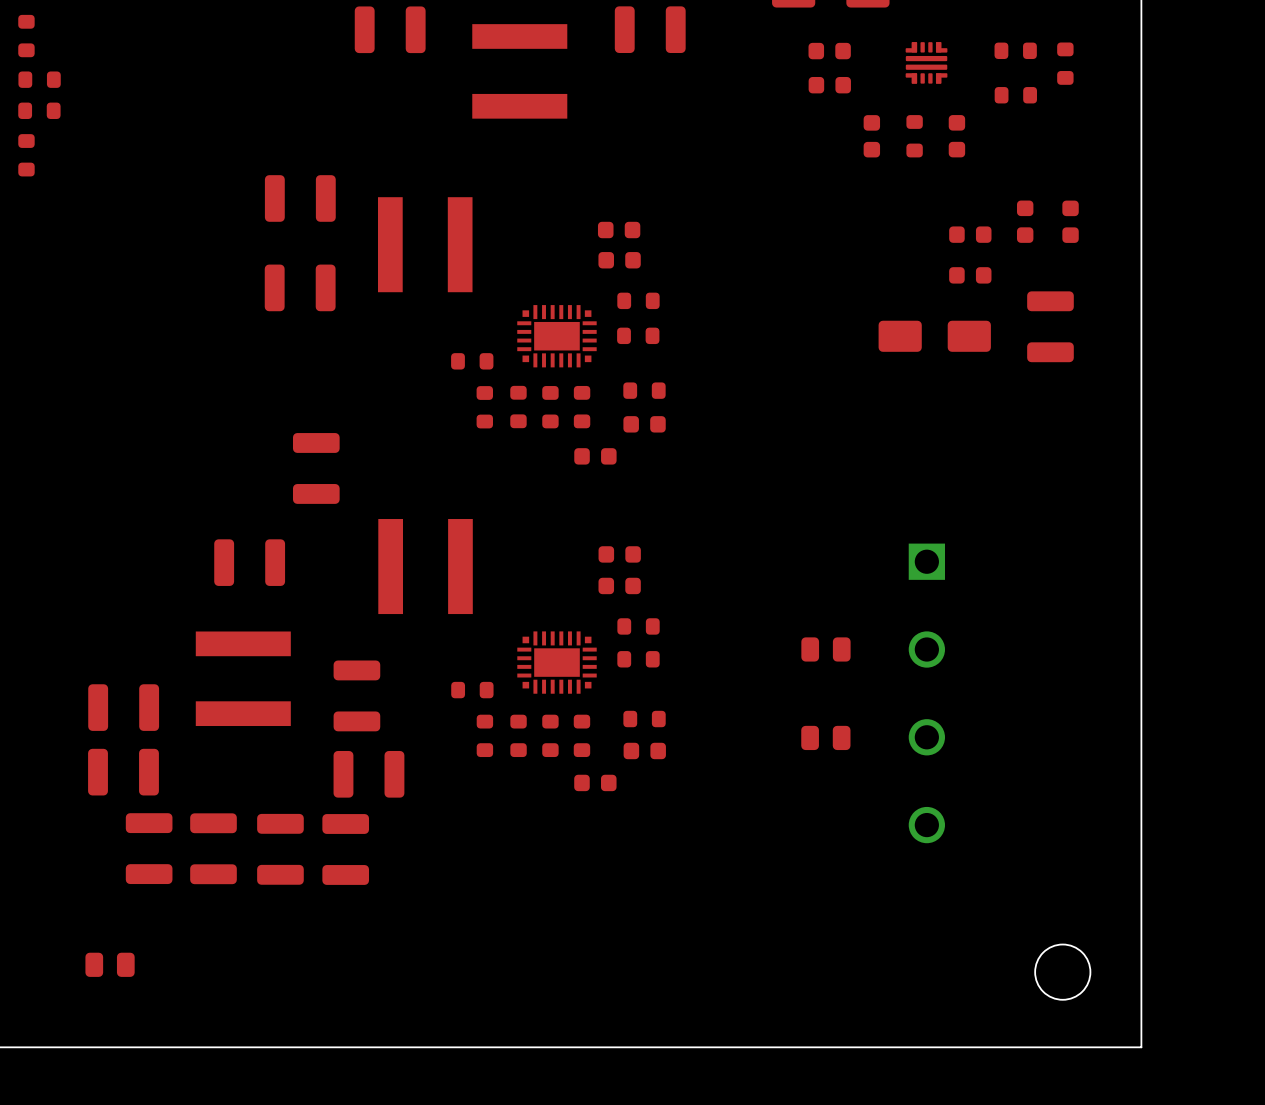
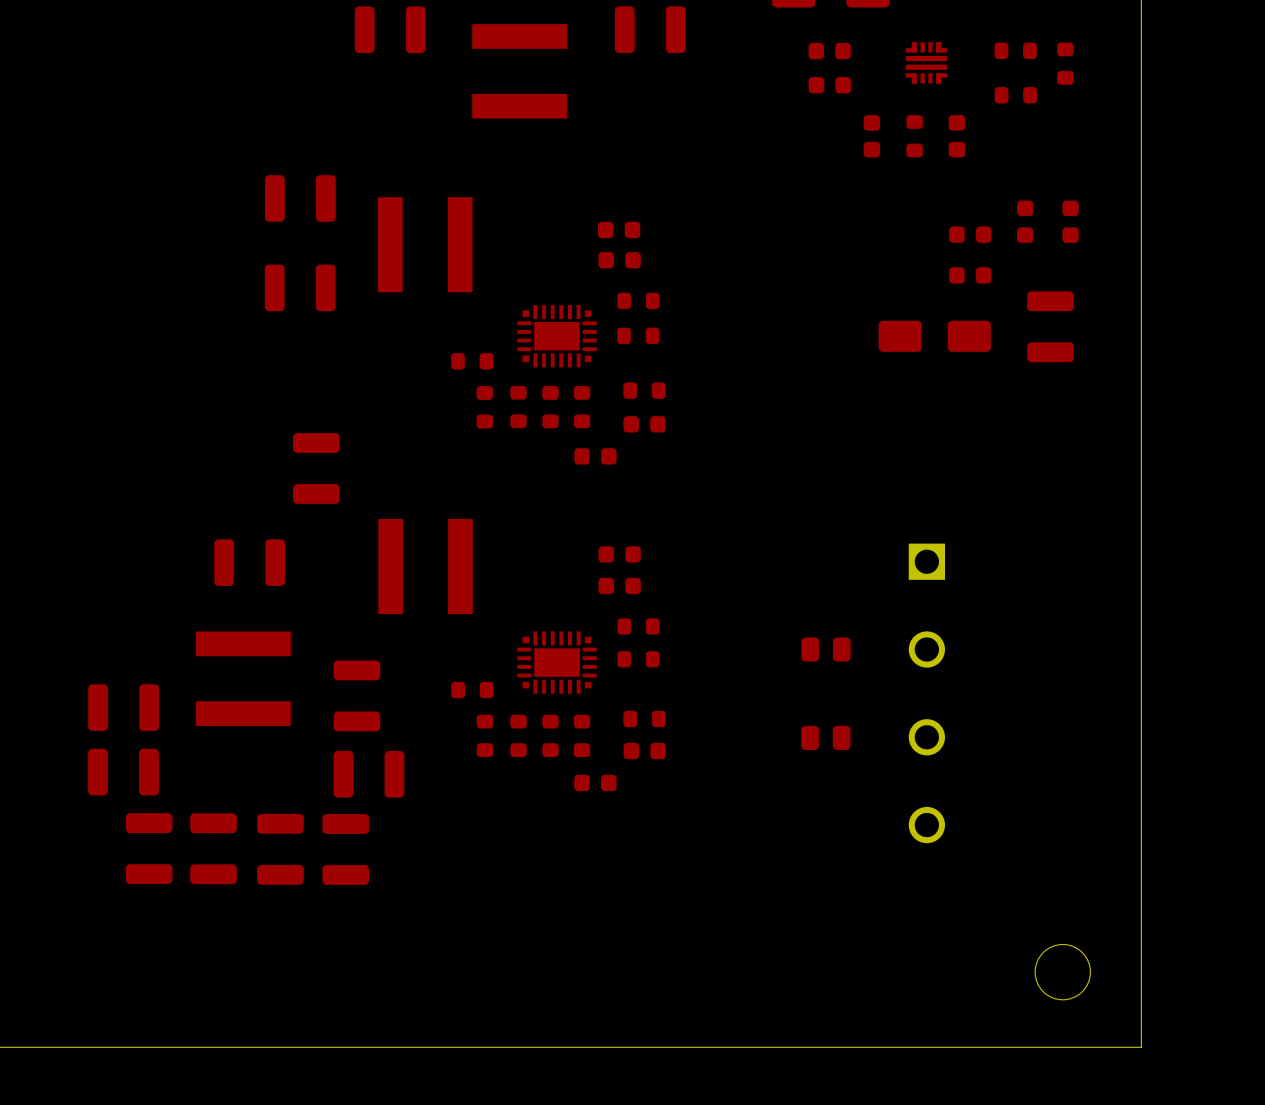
part: (26, 36) -> none
part: (39, 79) -> none
part: (39, 110) -> none
part: (26, 155) -> none
part: (110, 964) -> none

